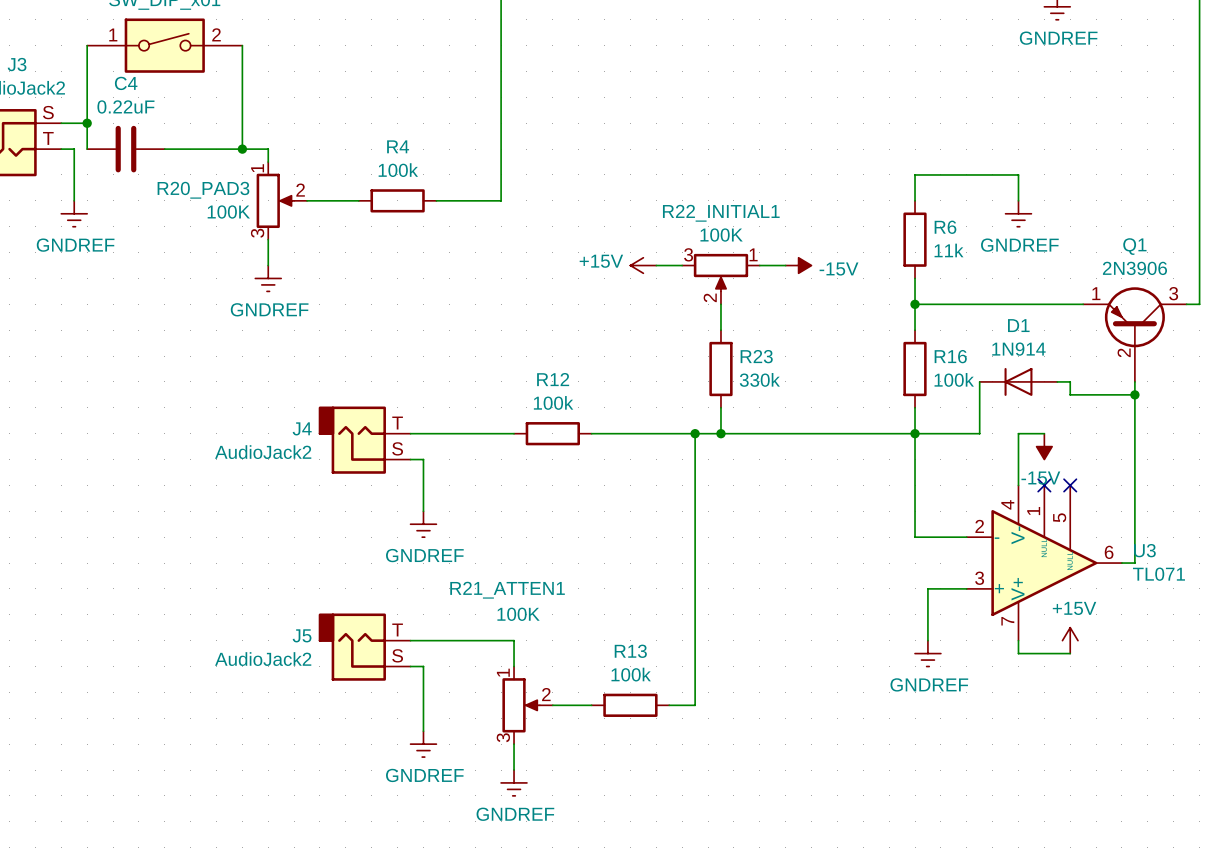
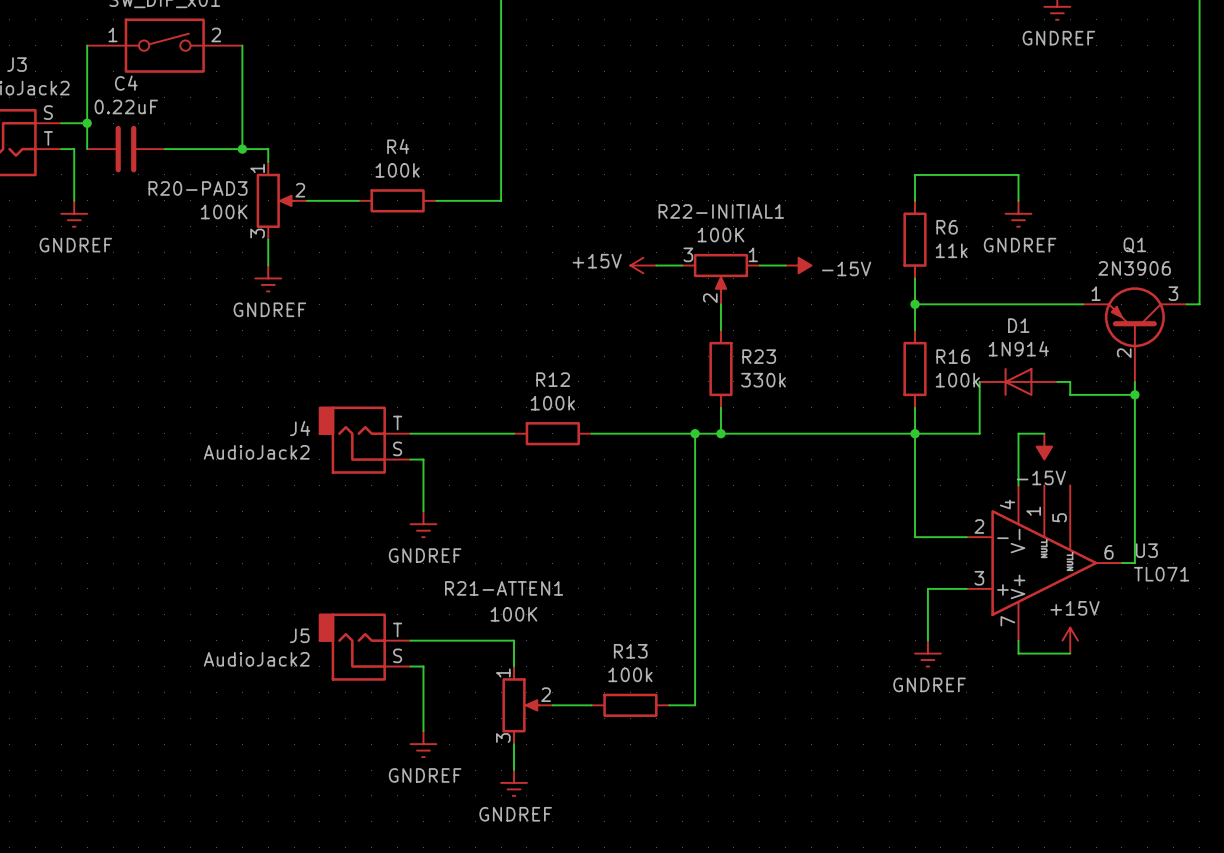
R20_PAD3 name: R20_PAD3 (203, 190) -> R20-PAD3 (198, 188)
R22_INITIAL1 name: R22_INITIAL1 (721, 213) -> R22-INITIAL1 (721, 211)
no-connect mark: (1044, 485) -> none
no-connect mark: (1070, 485) -> none
R21_ATTEN1 name: R21_ATTEN1 (507, 590) -> R21-ATTEN1 (504, 588)

